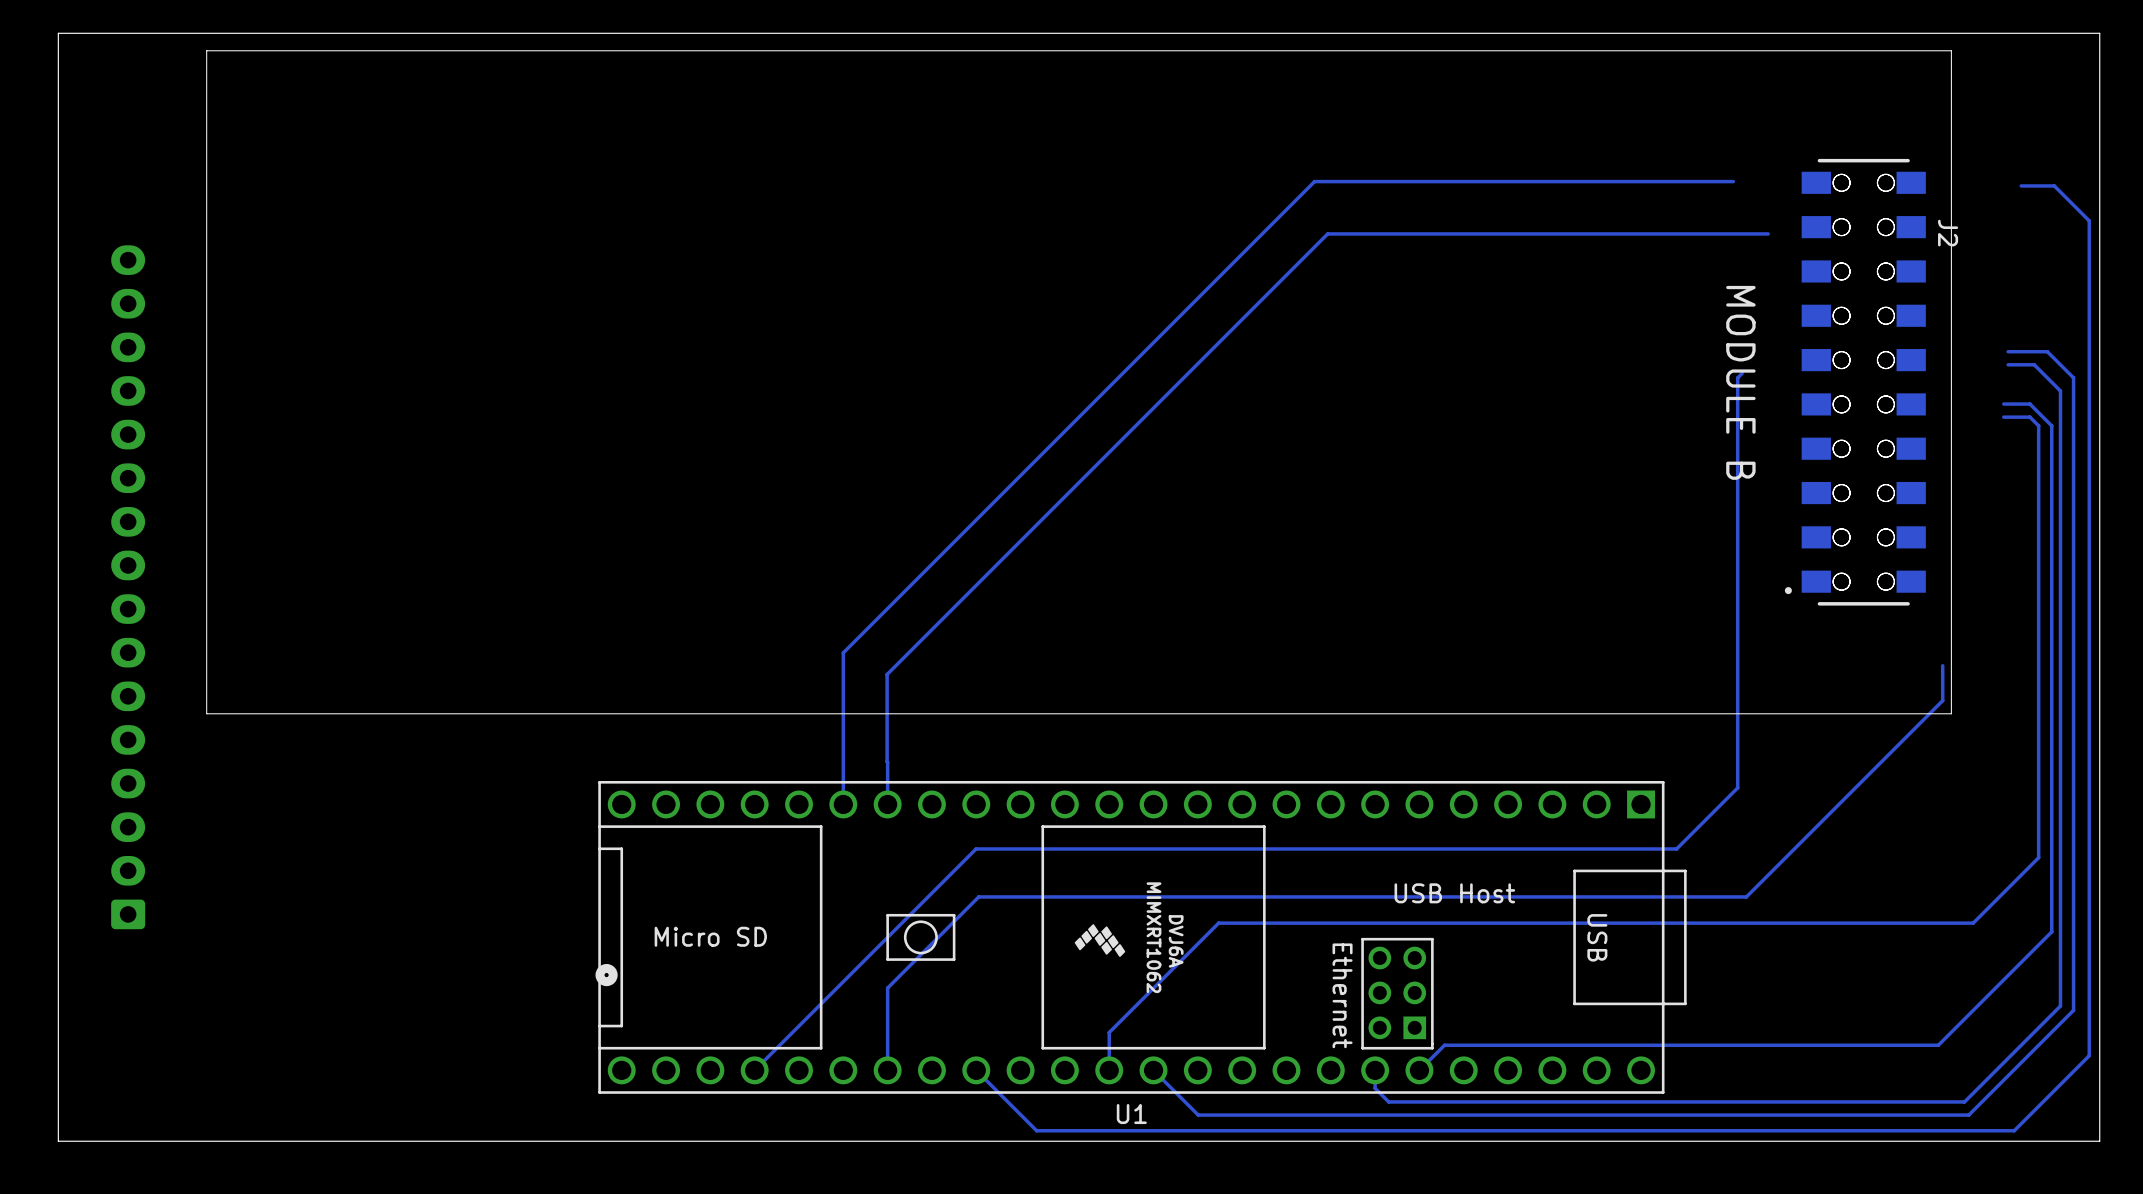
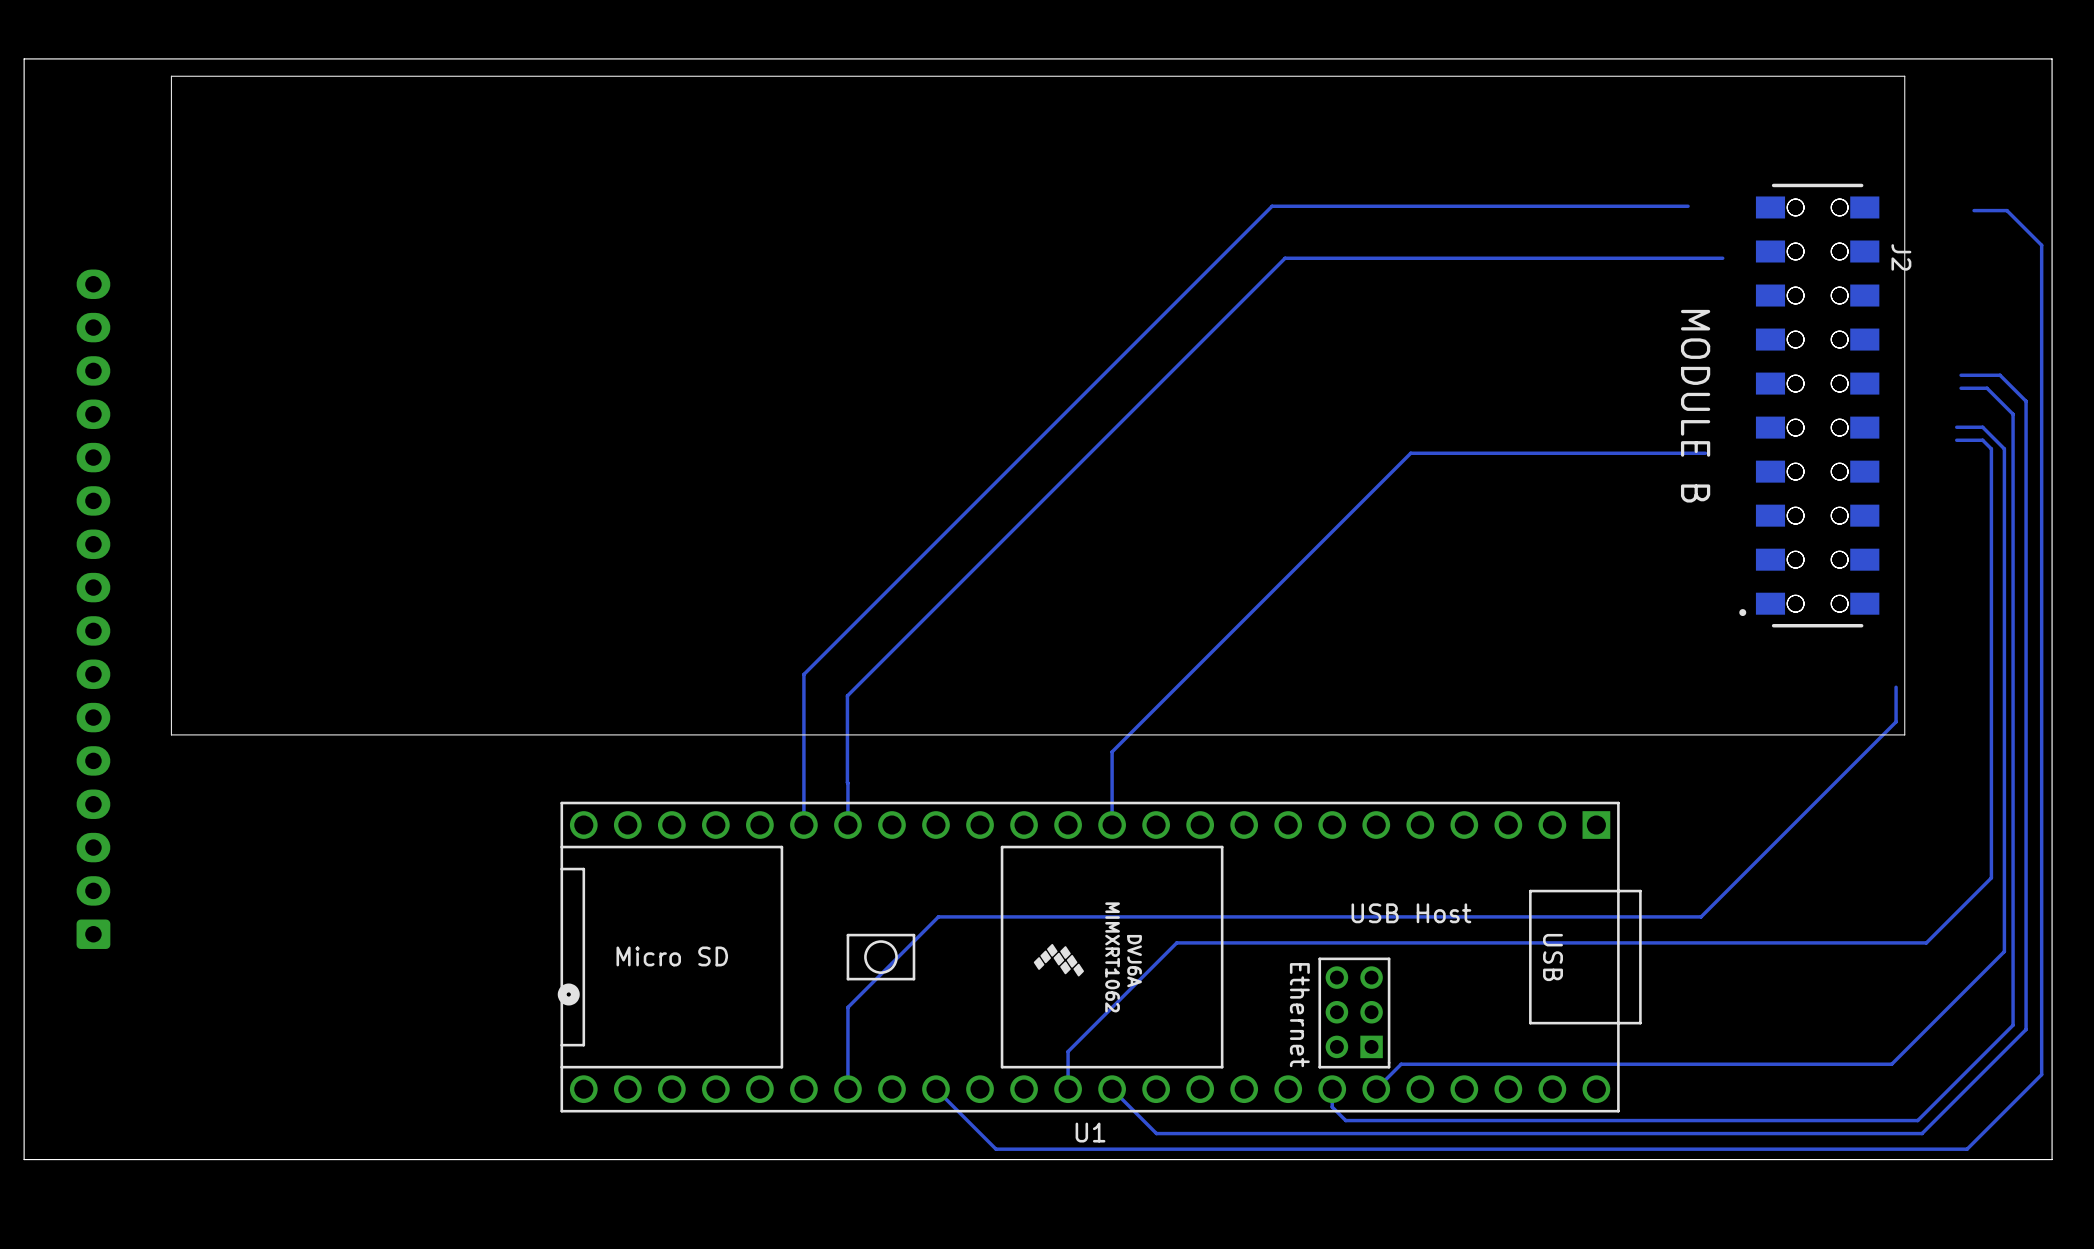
track: (1742, 373) (1737, 377) (1737, 787) (1676, 848) (976, 848) (754, 1070) -> none
track: none -> (1705, 453) (1410, 453) (1112, 751) (1112, 825)

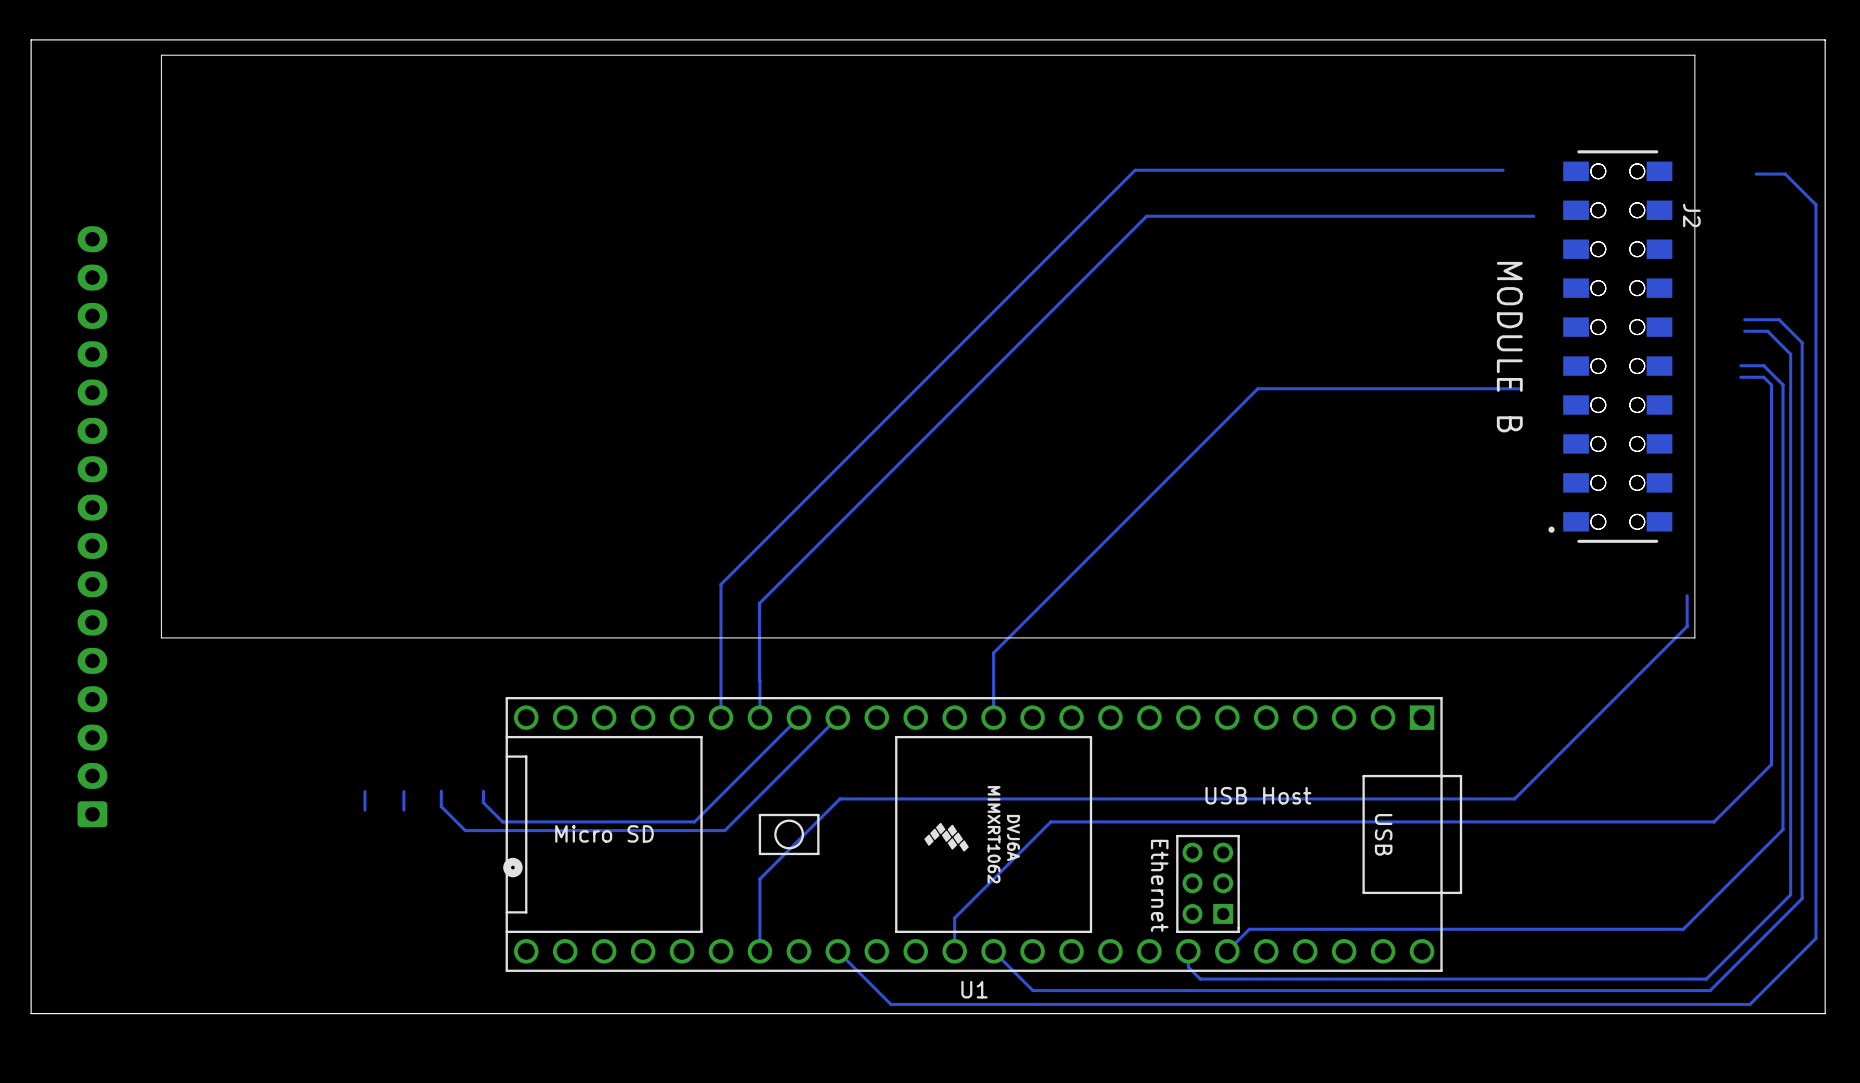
track: none -> (798, 717) (694, 821) (502, 821) (483, 802) (483, 791)
track: none -> (837, 717) (724, 830) (465, 830) (441, 806) (441, 791)
track: none -> (364, 791) (364, 810)
track: none -> (403, 791) (403, 810)

